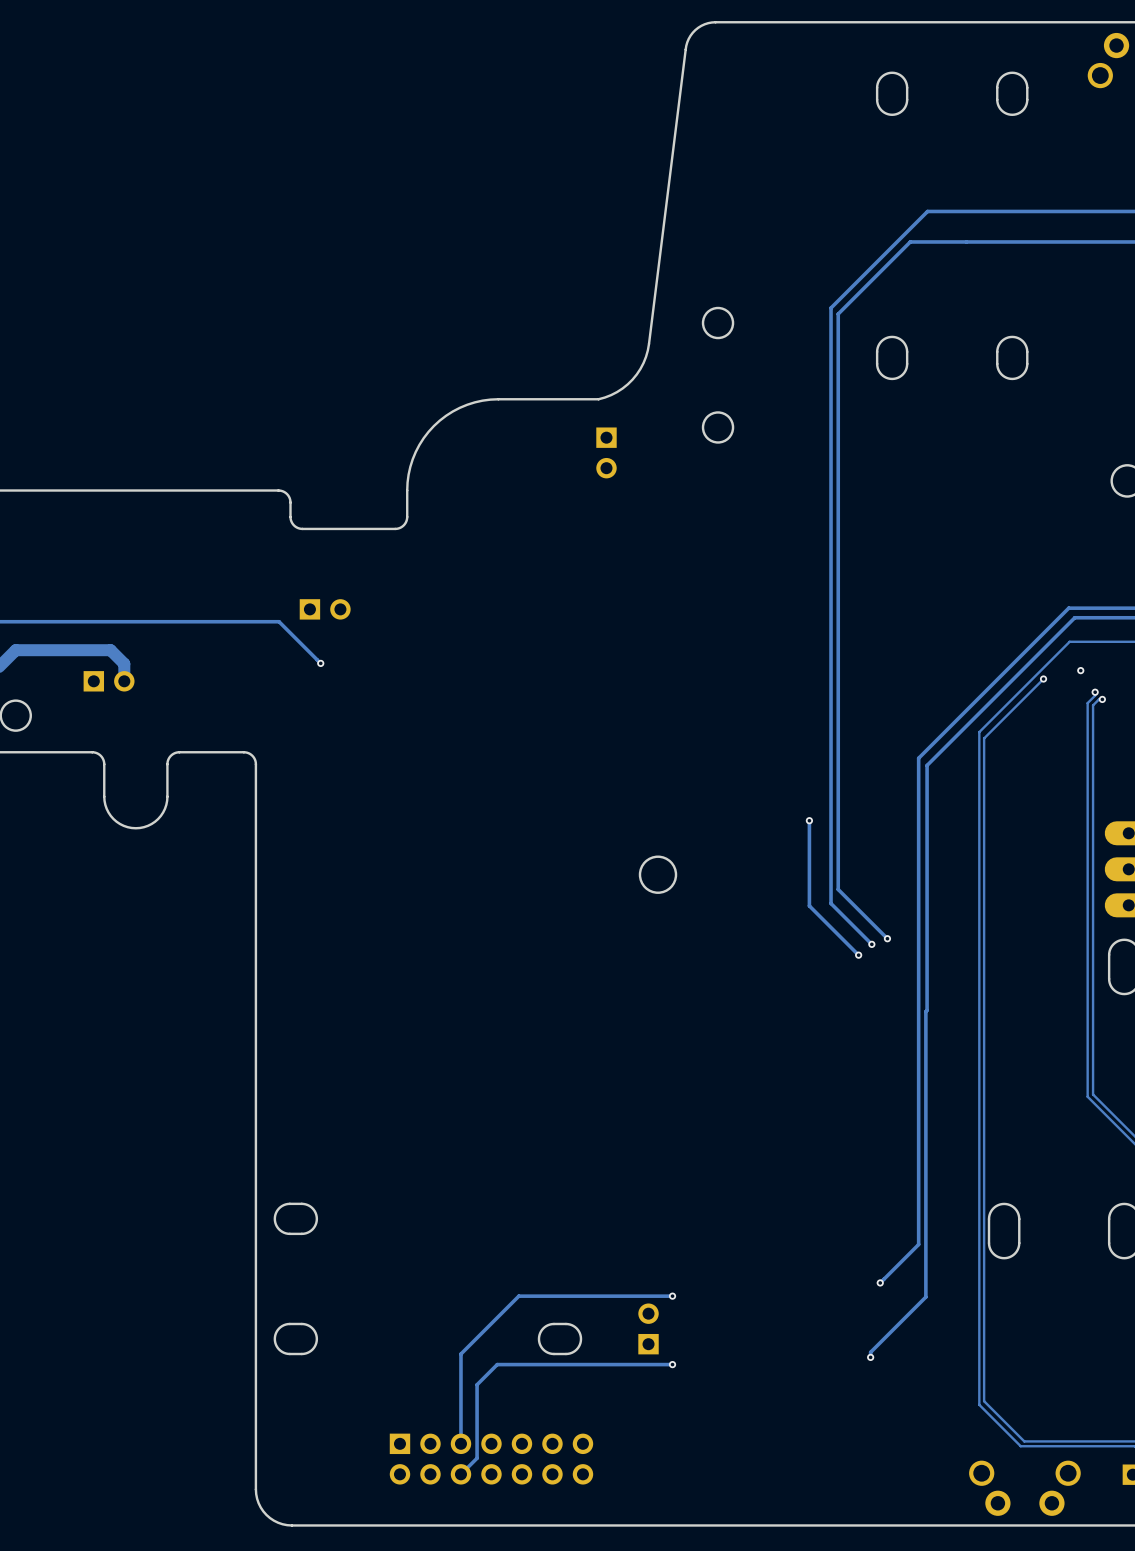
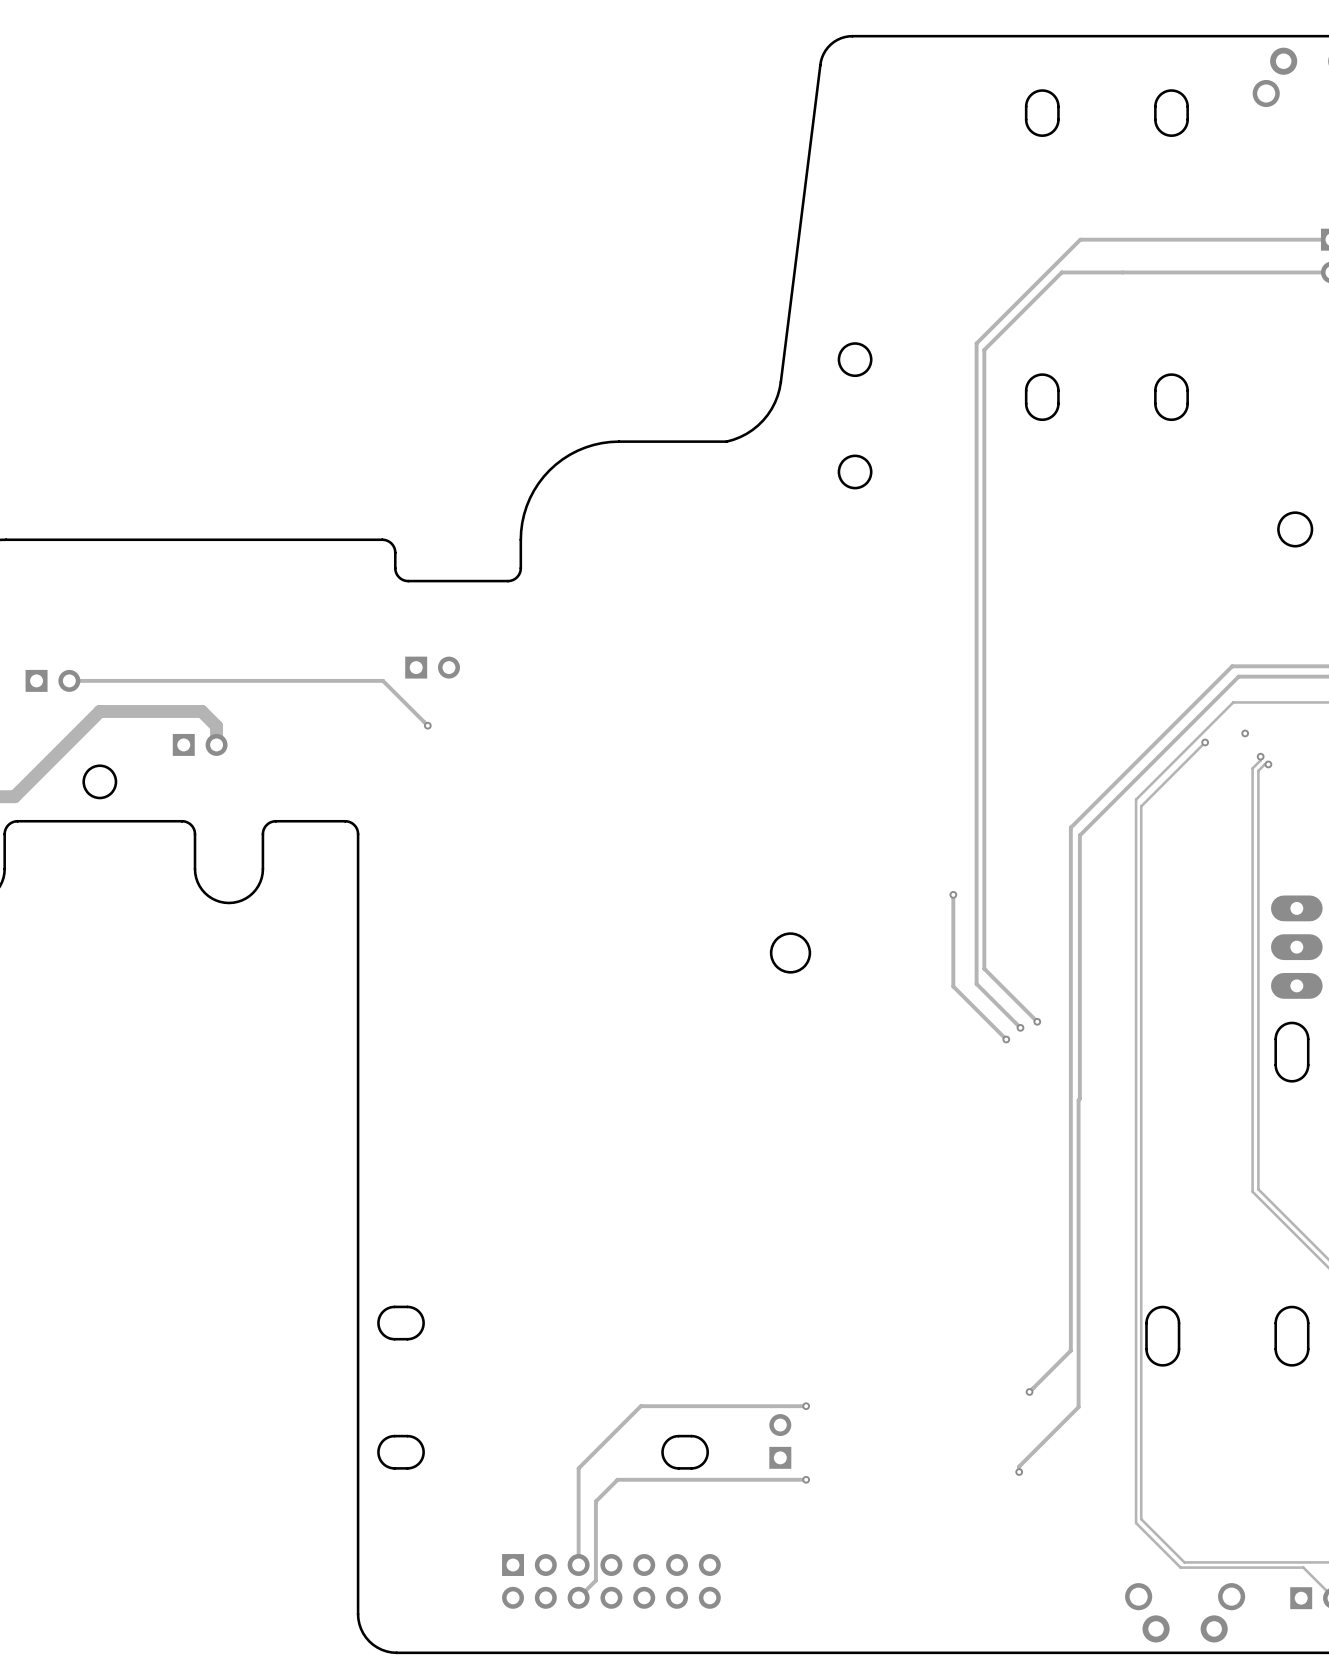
part: (606, 452) -> none

